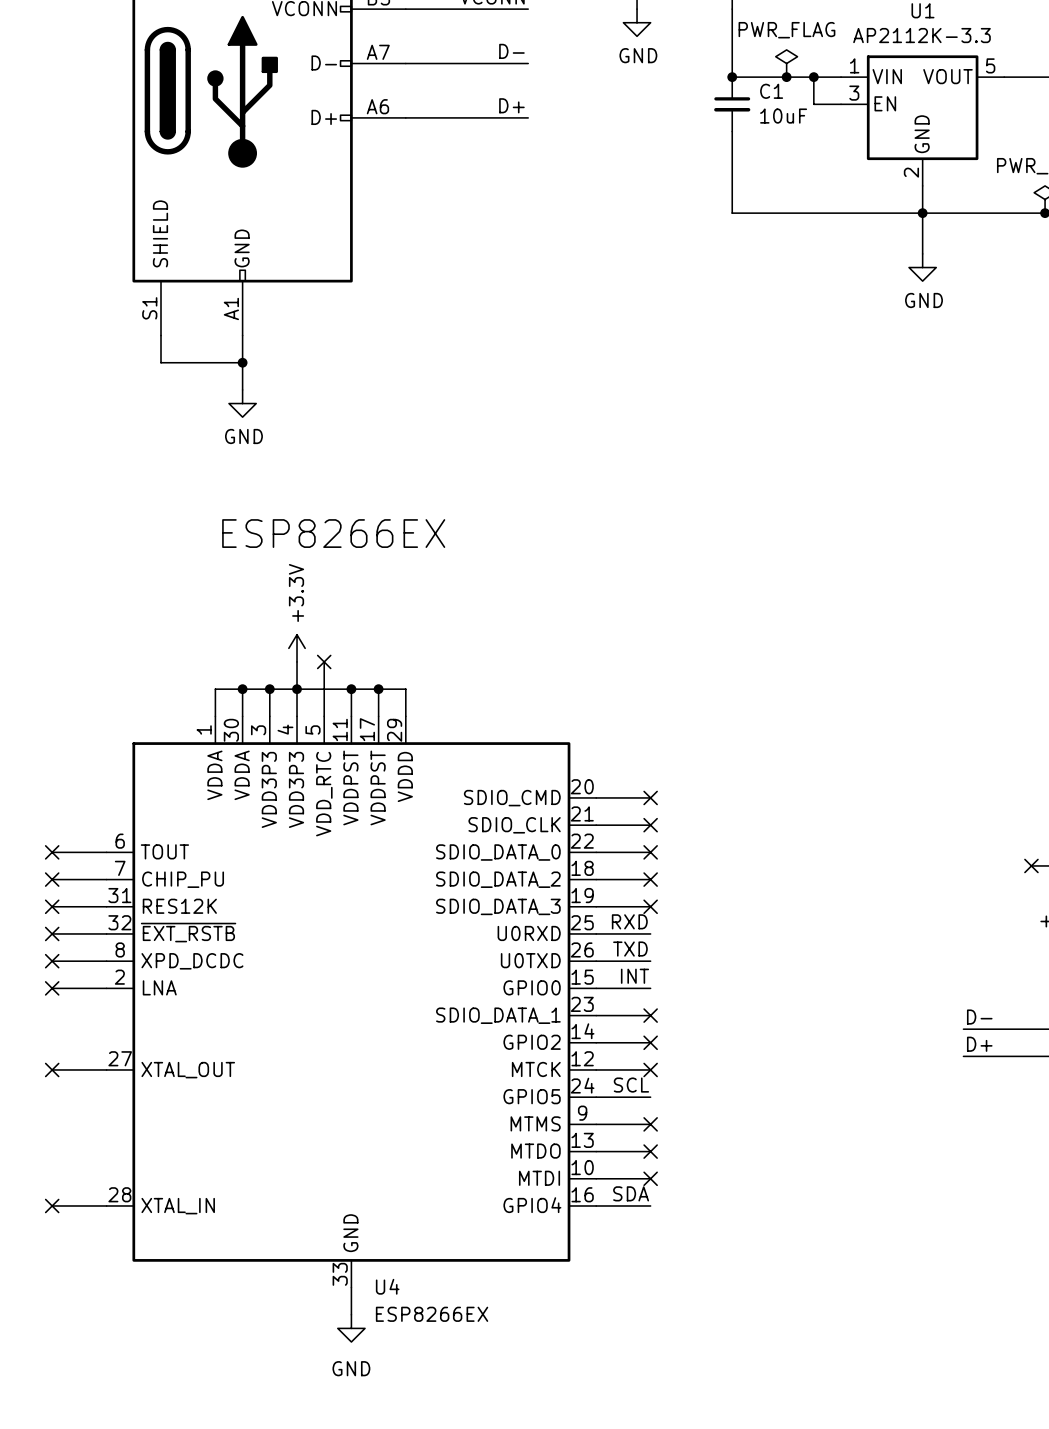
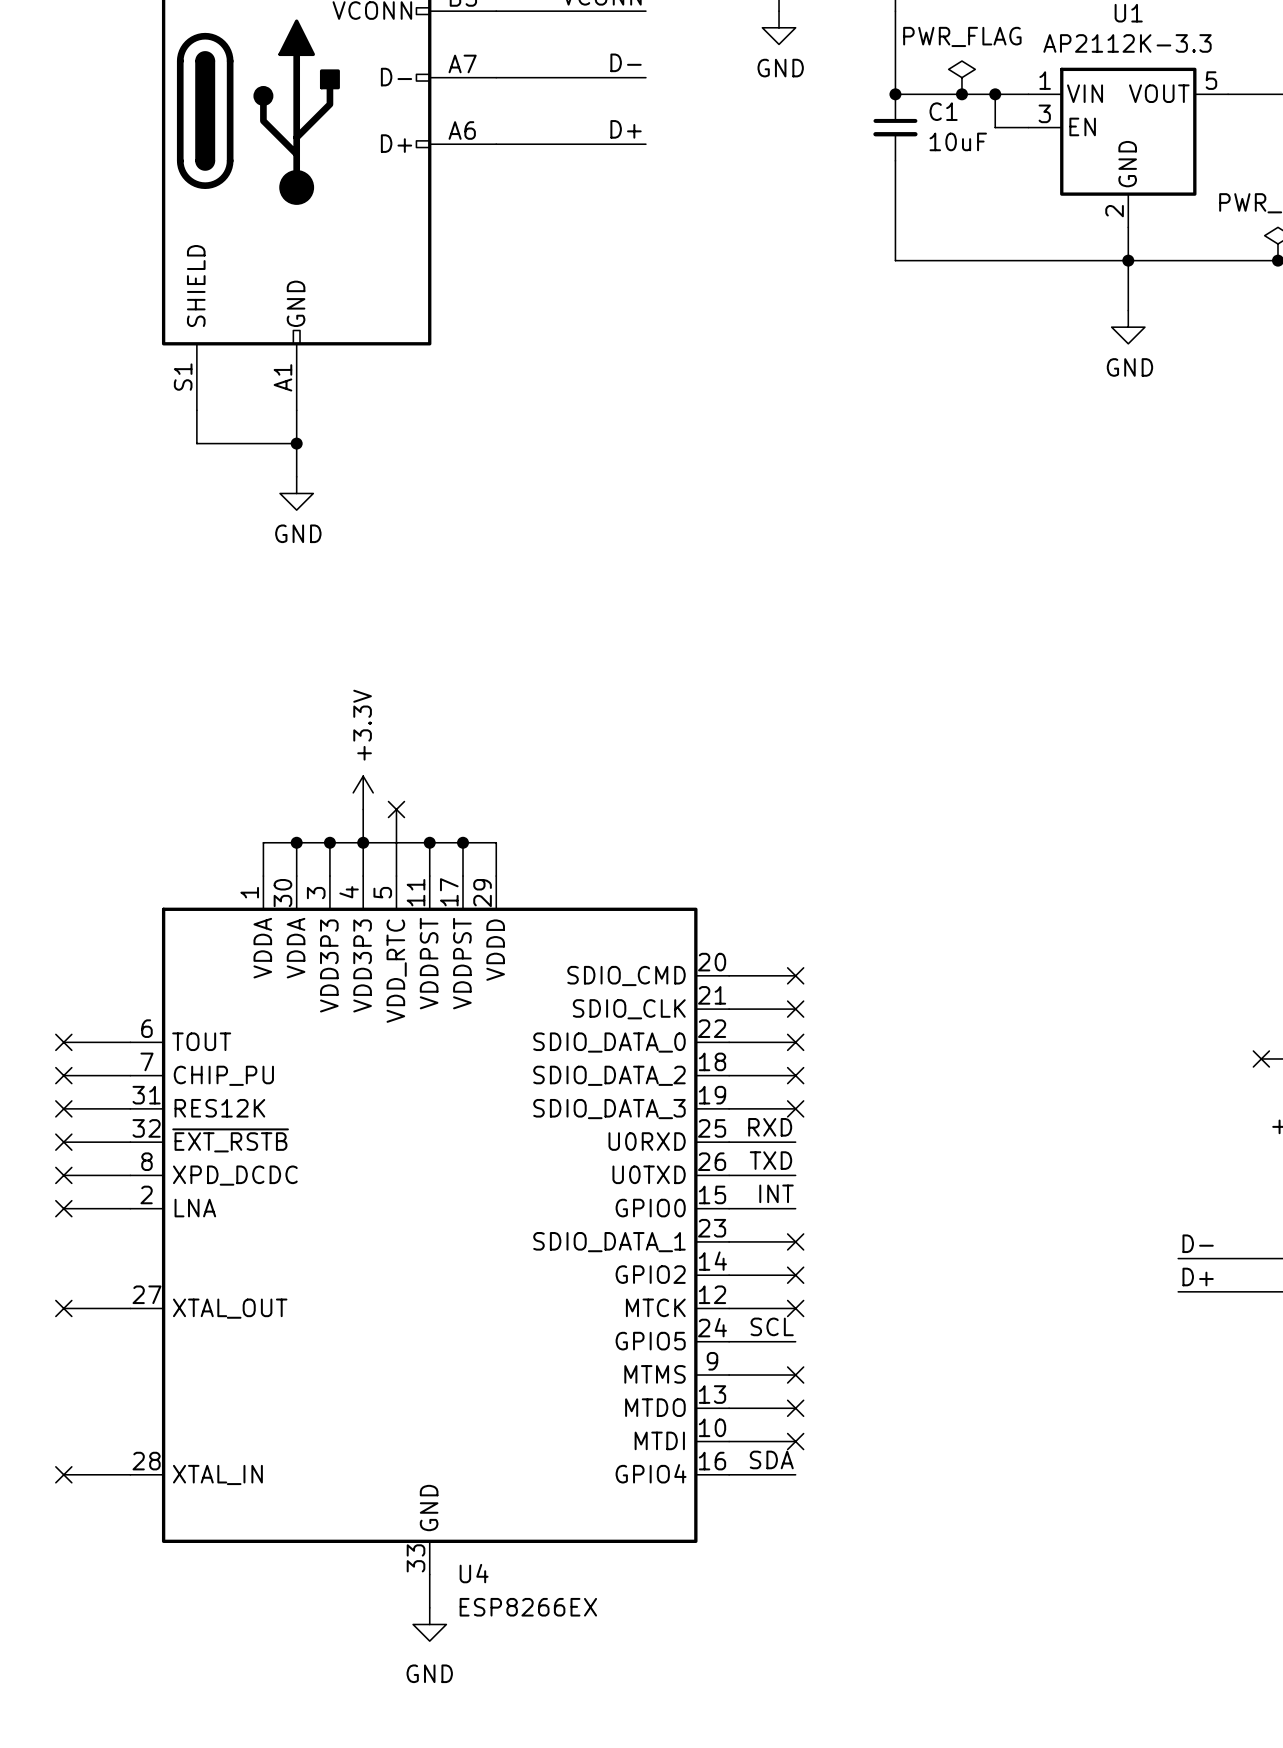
text: ESP8266EX (333, 533) -> none

